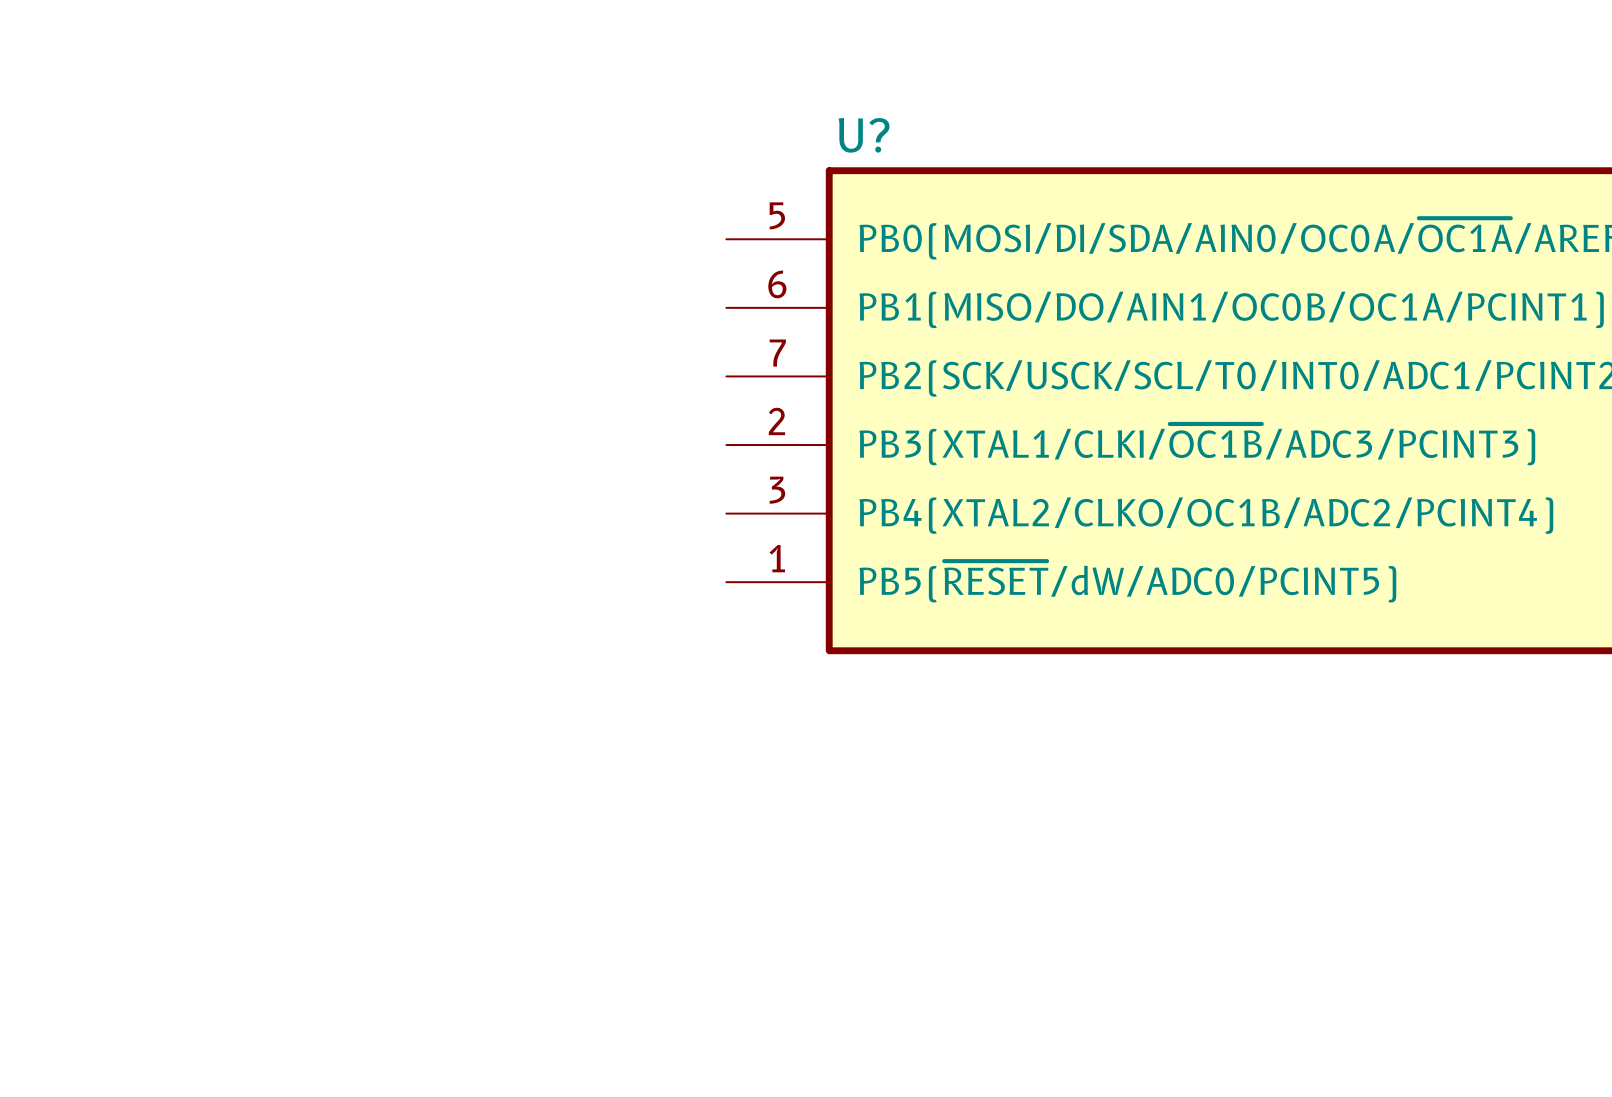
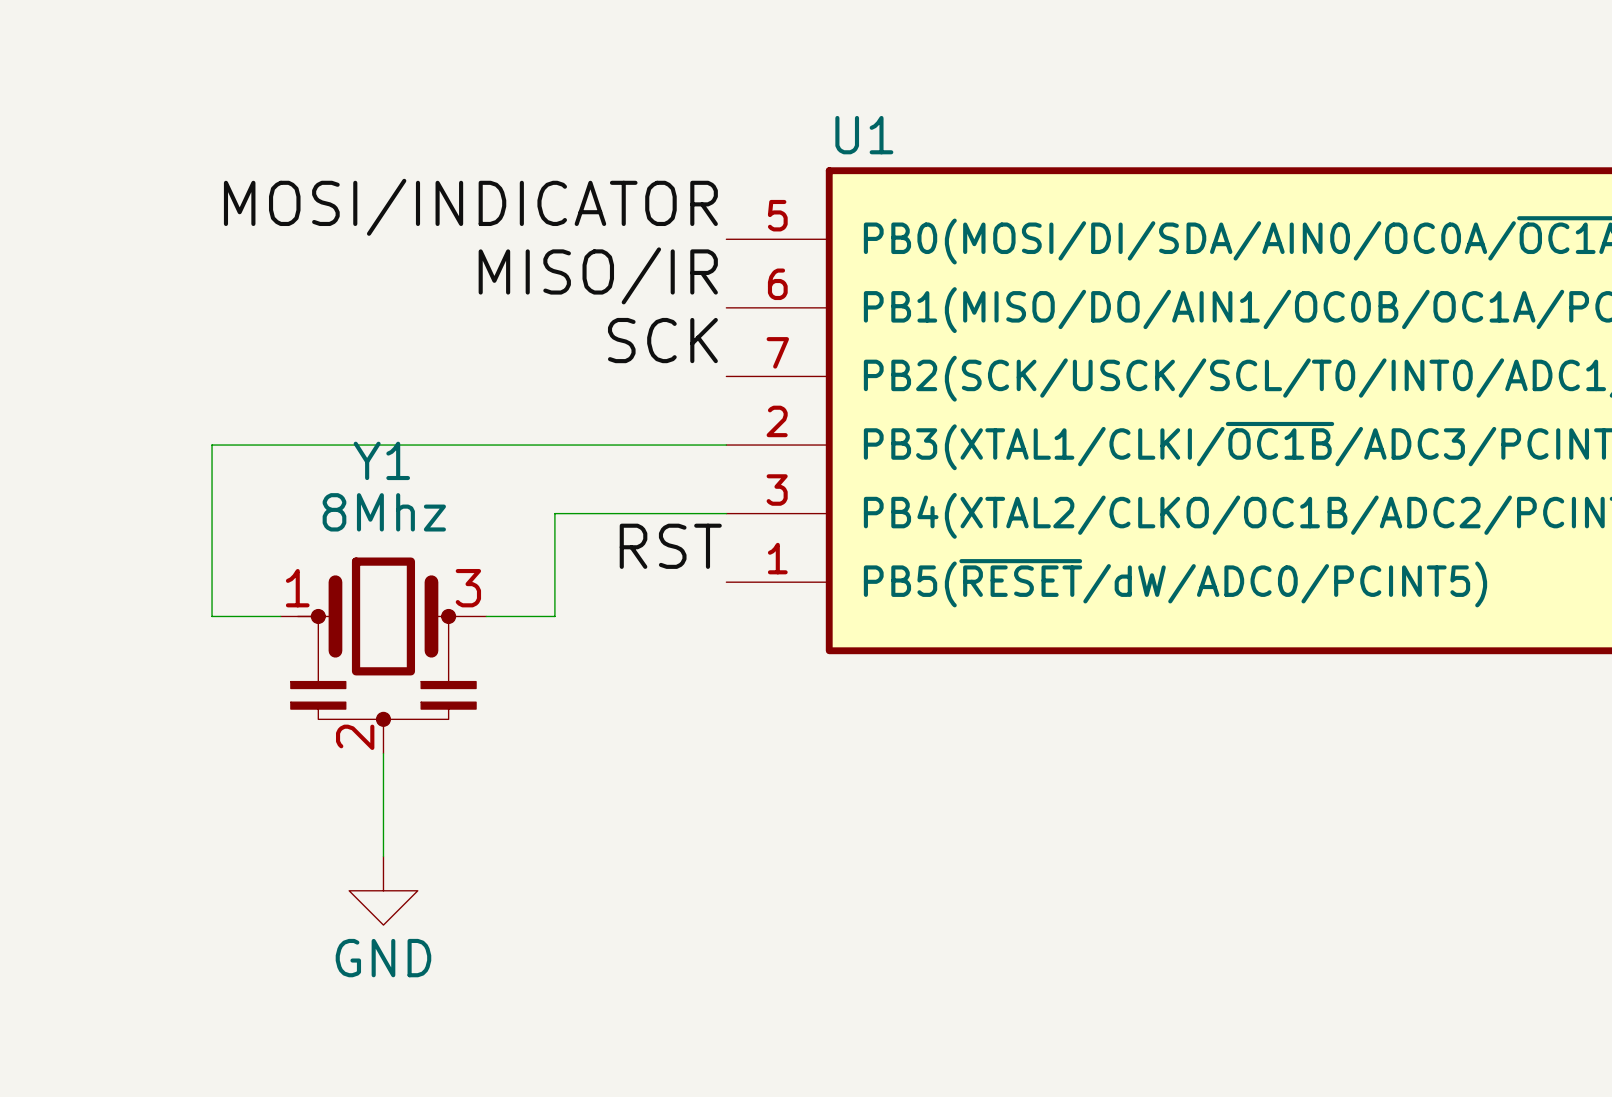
U? name: U? (864, 135) -> U1 (864, 135)
label: none -> MOSI/INDICATOR (470, 207)
label: none -> MISO/IR (598, 275)
label: none -> SCK (662, 340)
wire: none -> (726, 445) (212, 445) (212, 616) (280, 616)
wire: none -> (726, 513) (554, 513) (554, 616) (486, 616)
label: none -> RST (670, 546)
Y1: none -> 8Mhz (383, 655)
wire: none -> (383, 753) (383, 856)
power symbol: none -> GND (383, 890)

